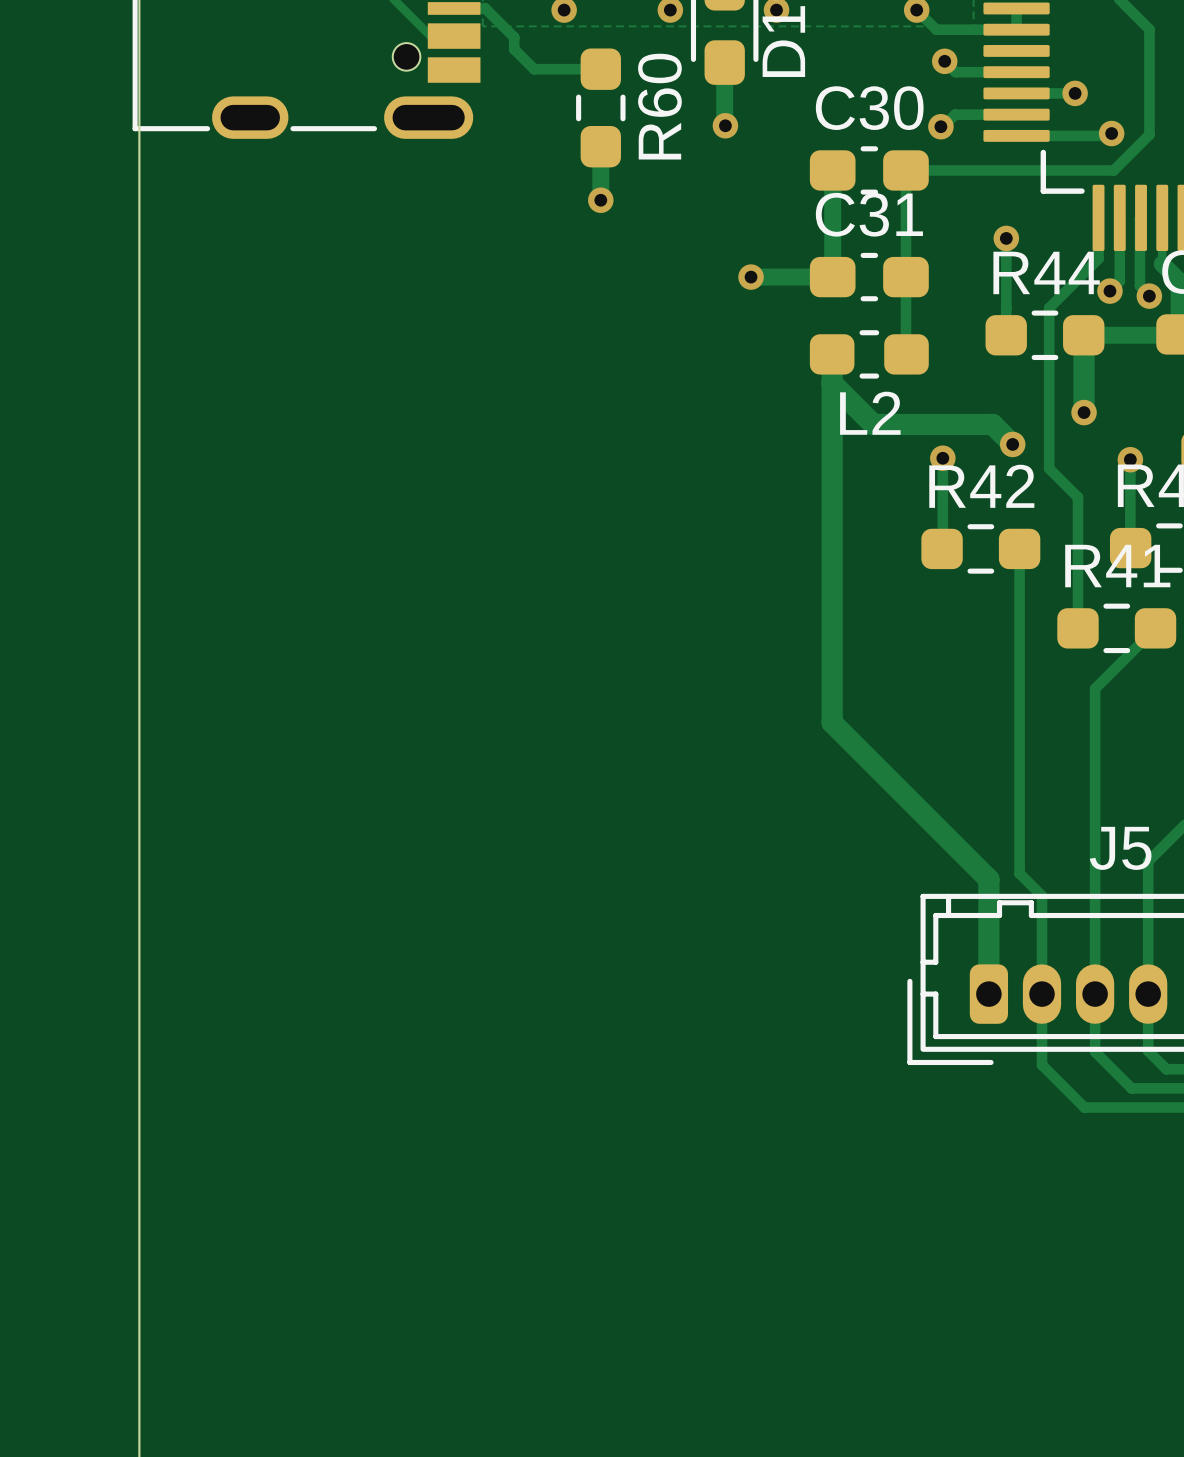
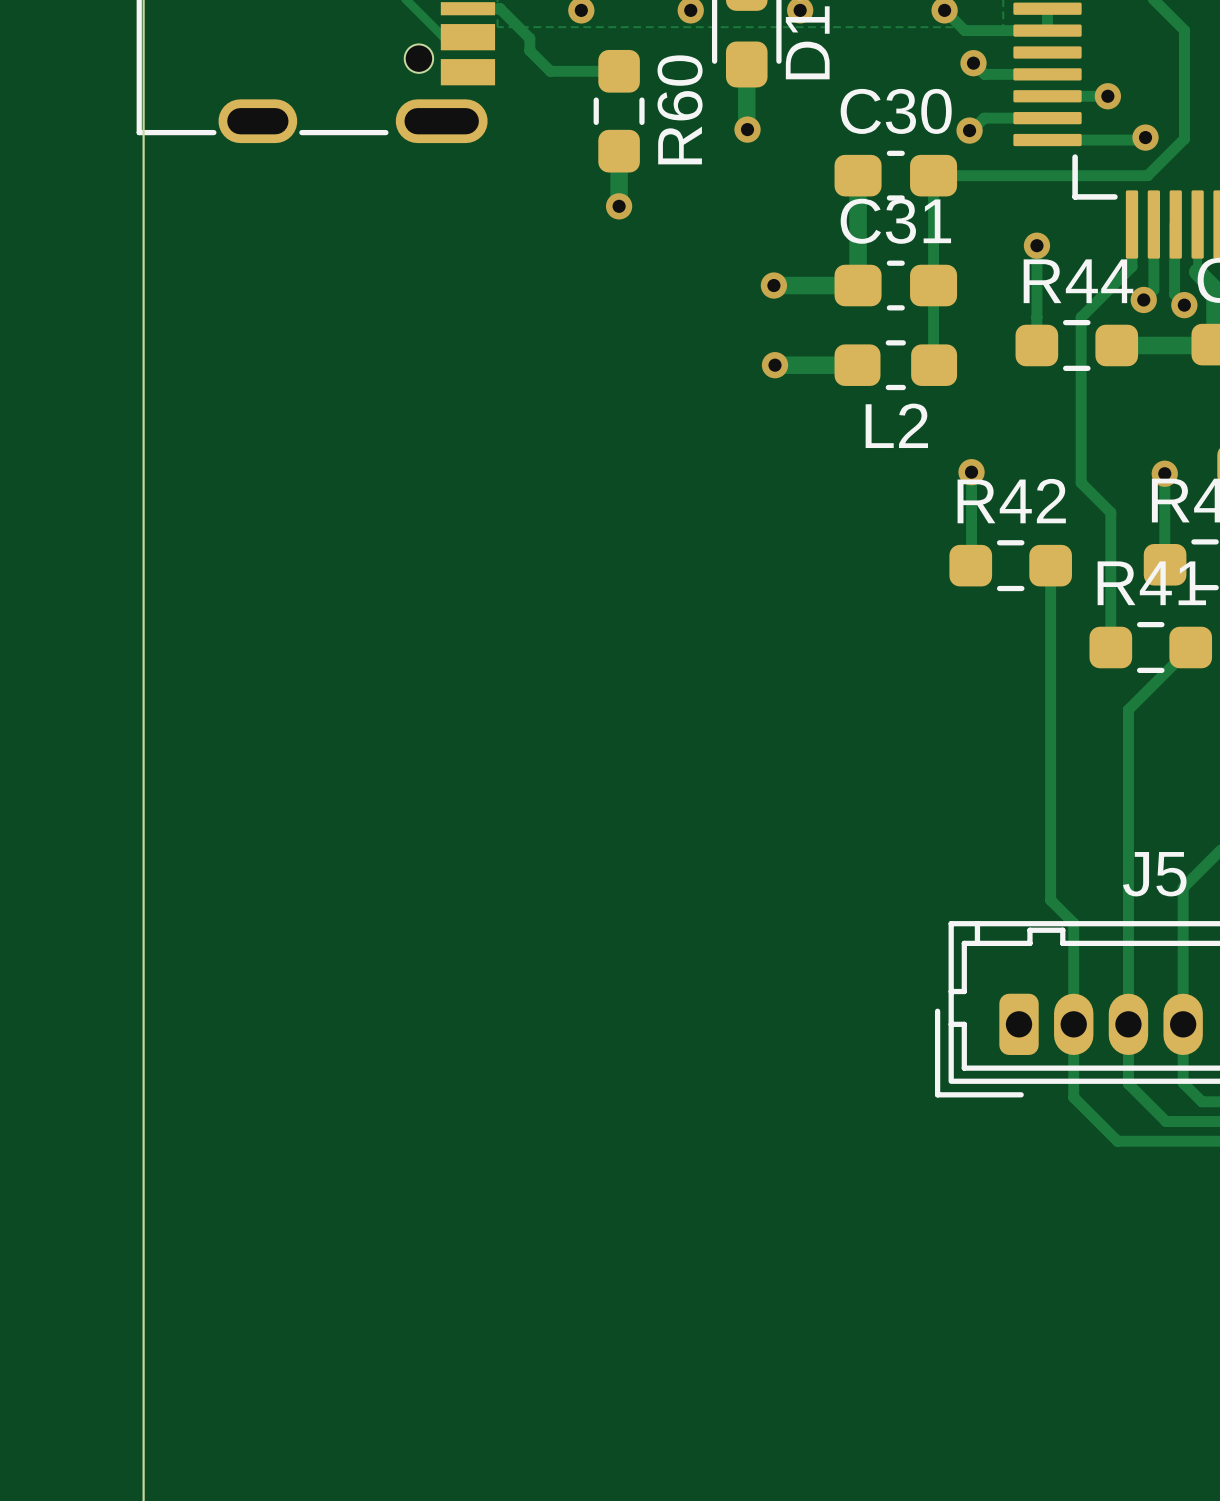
track: (1084, 335) (1084, 412) -> none
via: none -> (775, 365)
track: (832, 354) (832, 722) (988, 879) (988, 994) -> (857, 365) (775, 365)
track: (832, 383) (873, 424) (992, 424) (1012, 444) -> none
via: (1084, 412) -> none
via: (1012, 444) -> none

